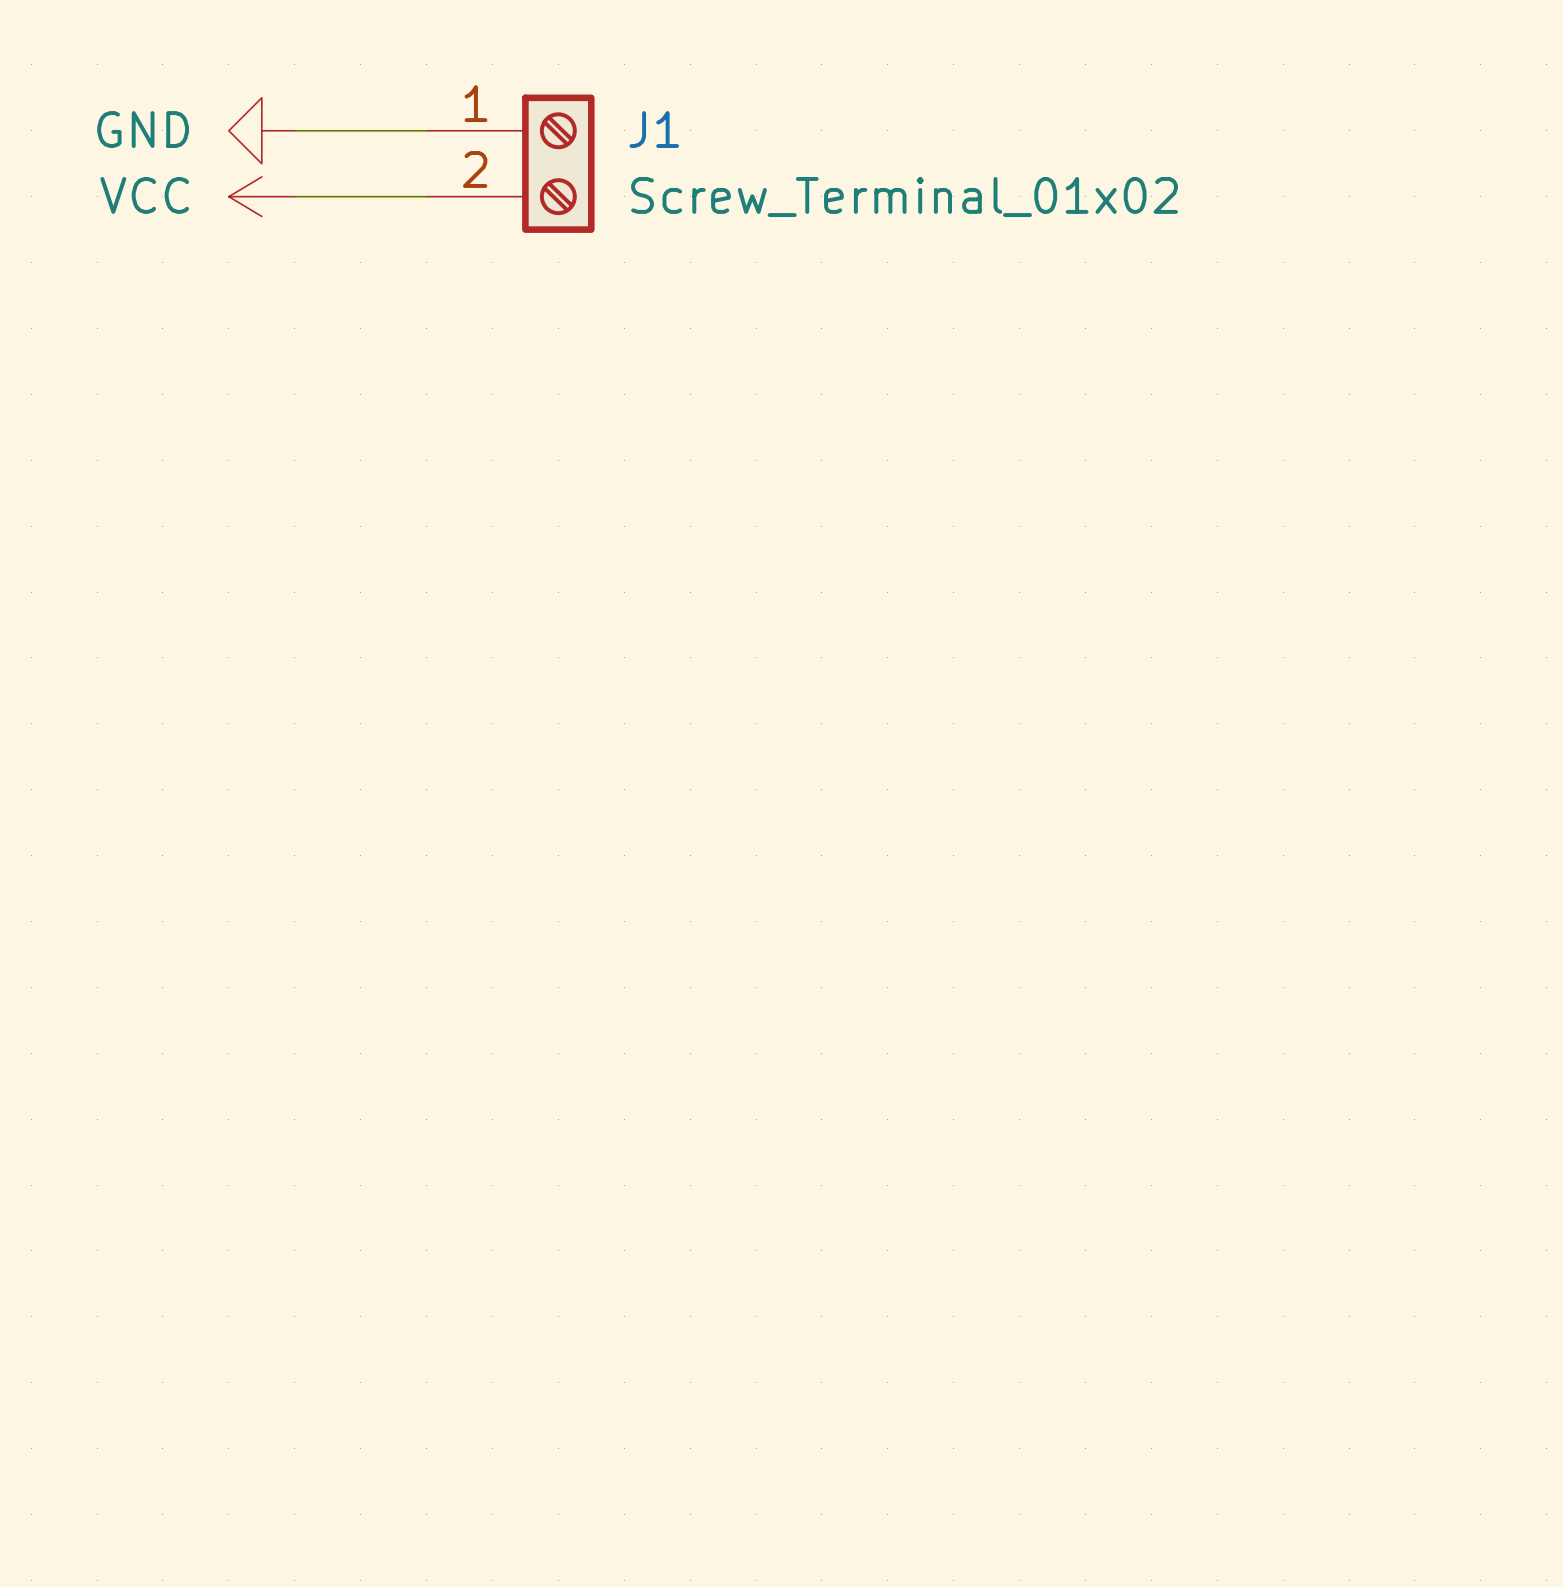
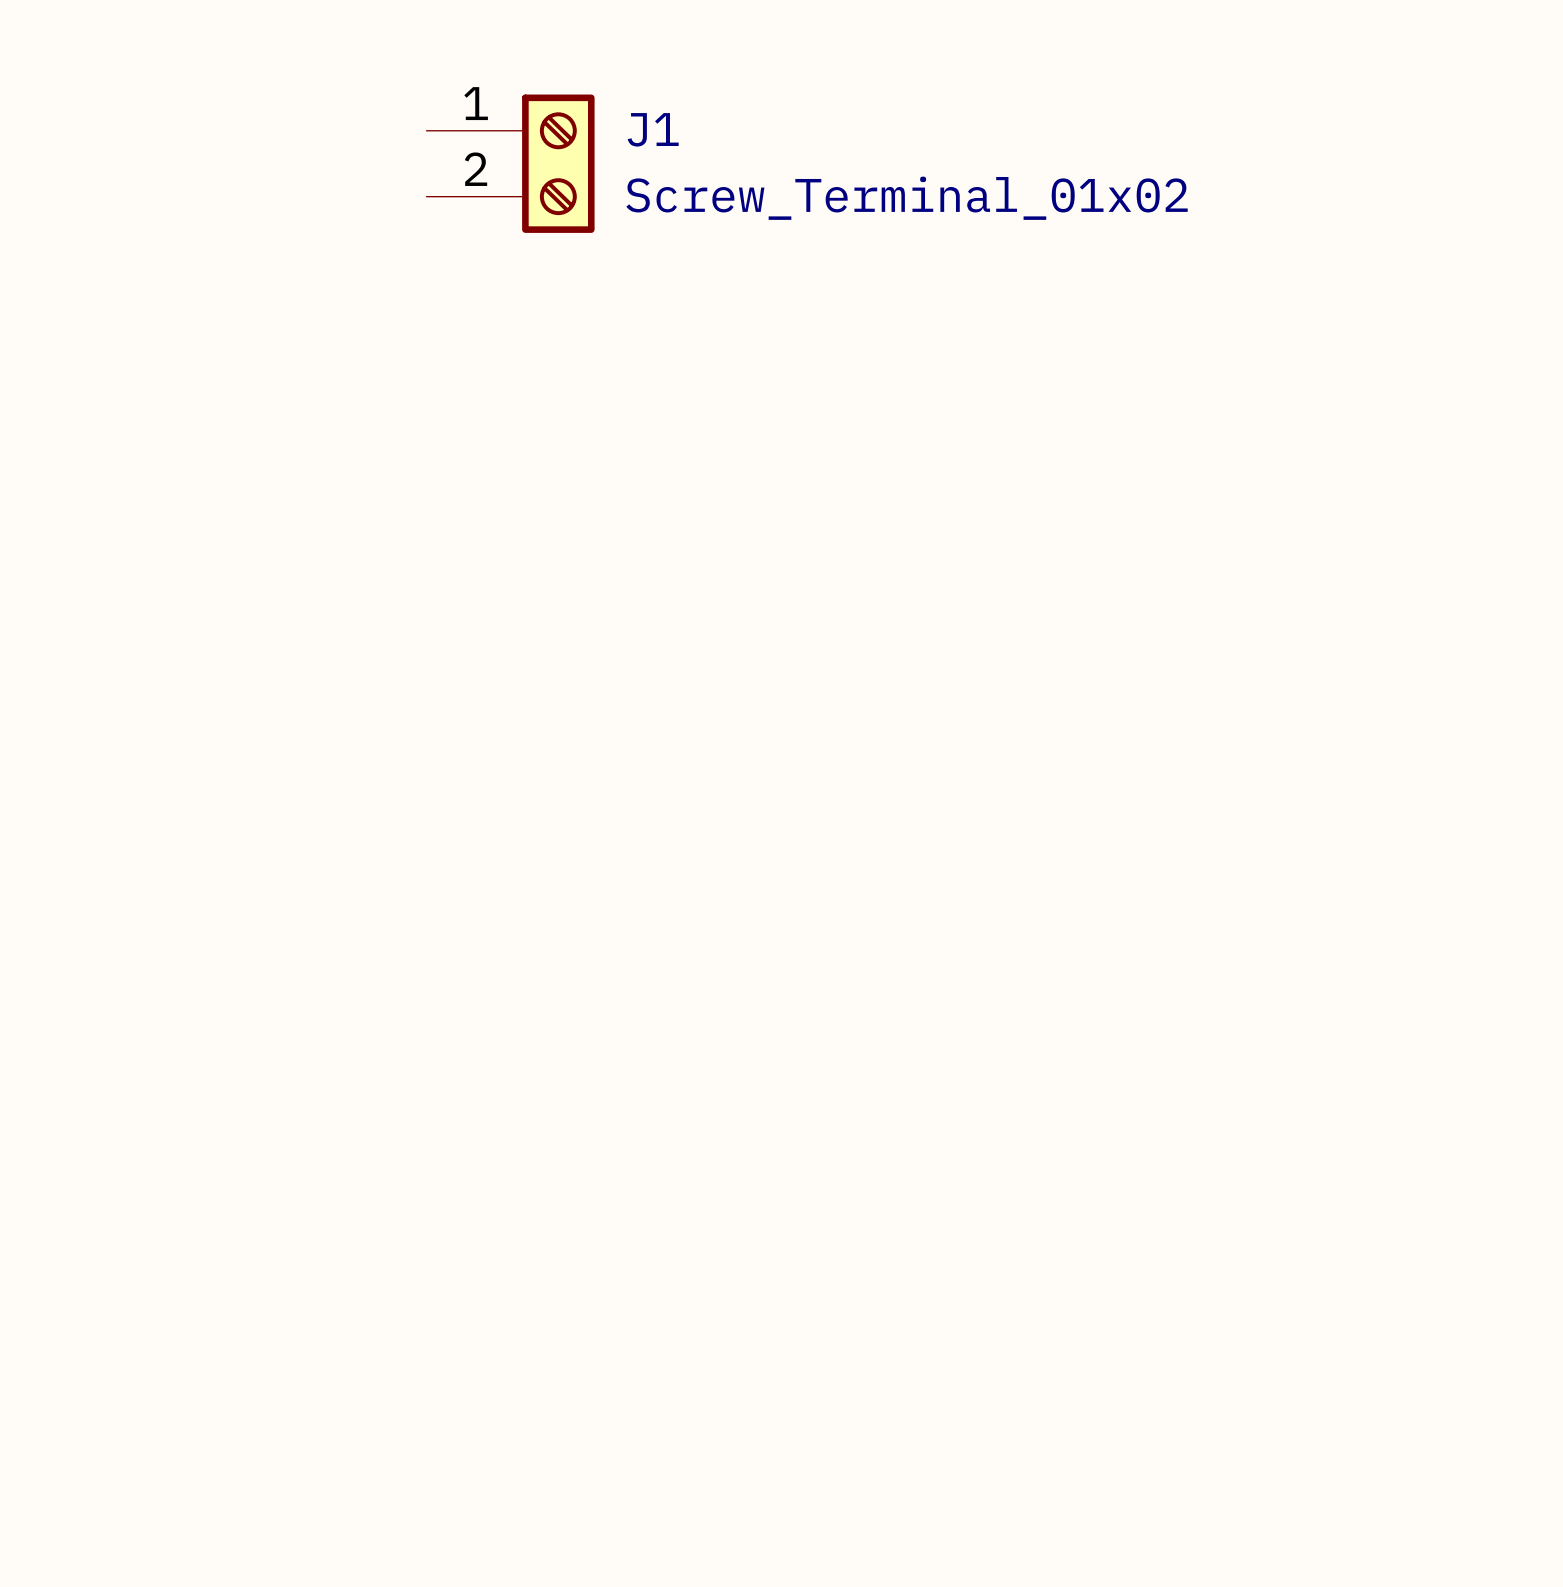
power symbol: GND (261, 130) -> none
wire: (294, 130) (426, 130) -> none
power symbol: VCC (261, 196) -> none
wire: (294, 196) (426, 196) -> none

